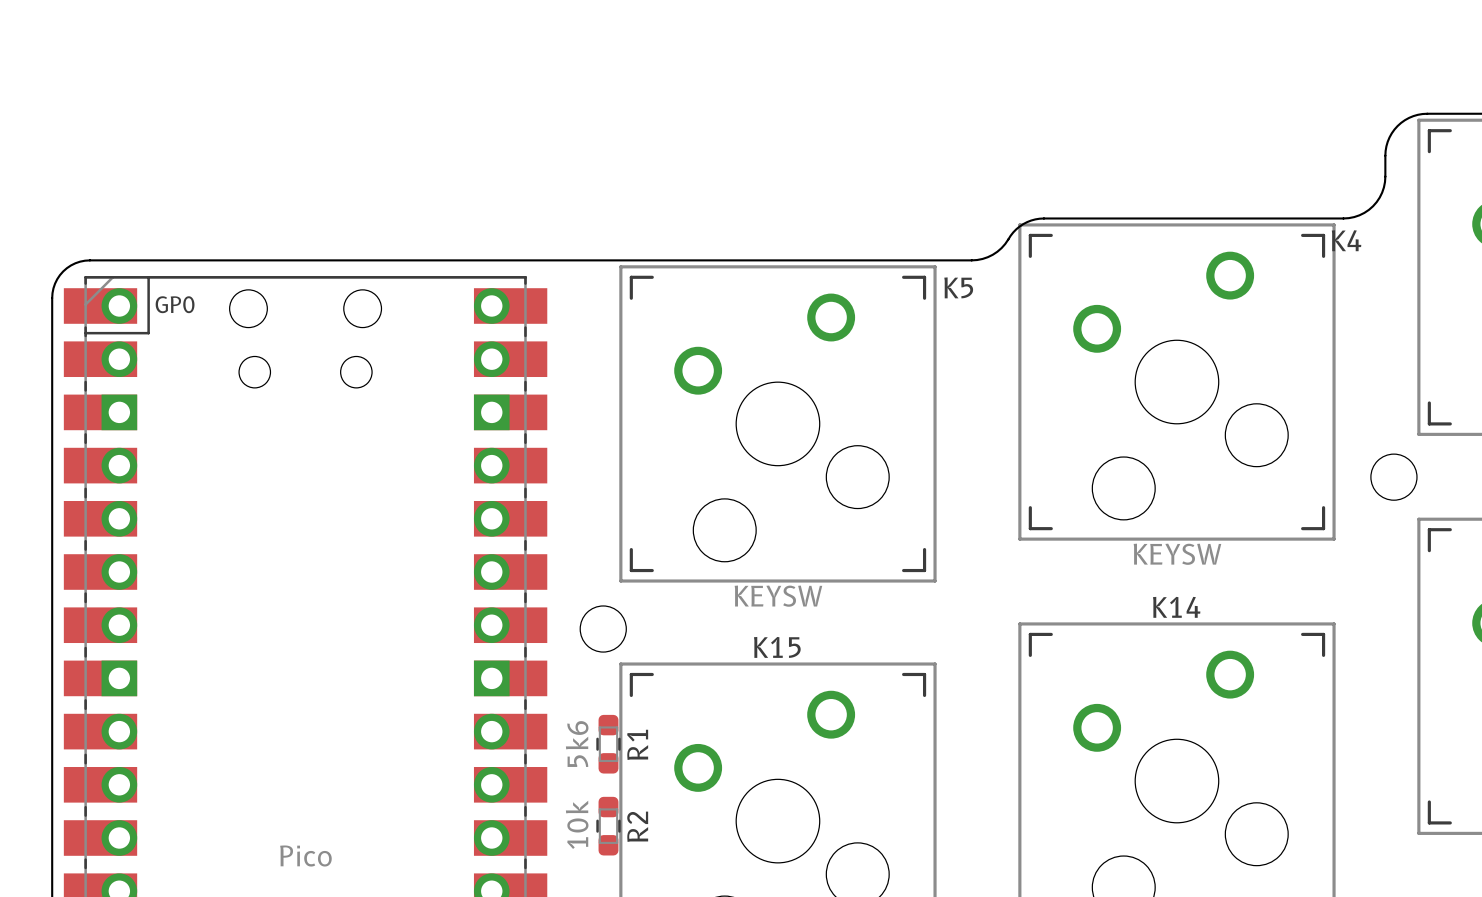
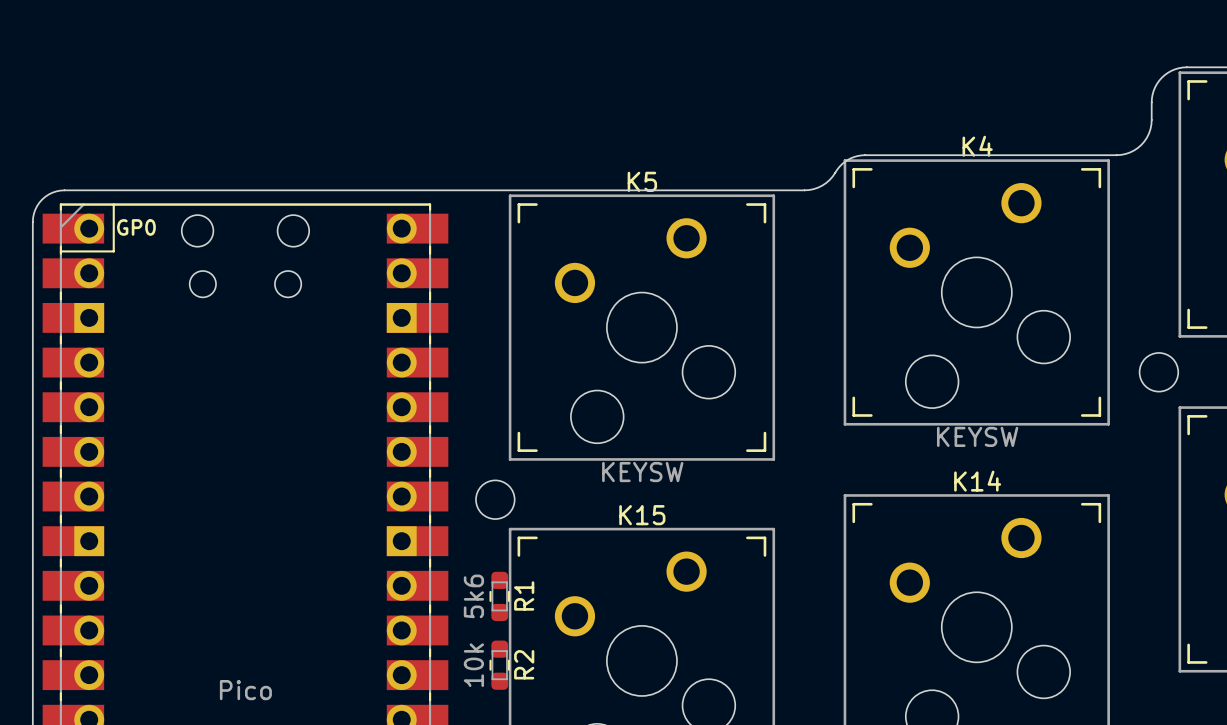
K4 name position: K4 (1346, 240) -> K4 (977, 146)
K5 name position: K5 (958, 287) -> K5 (642, 181)

